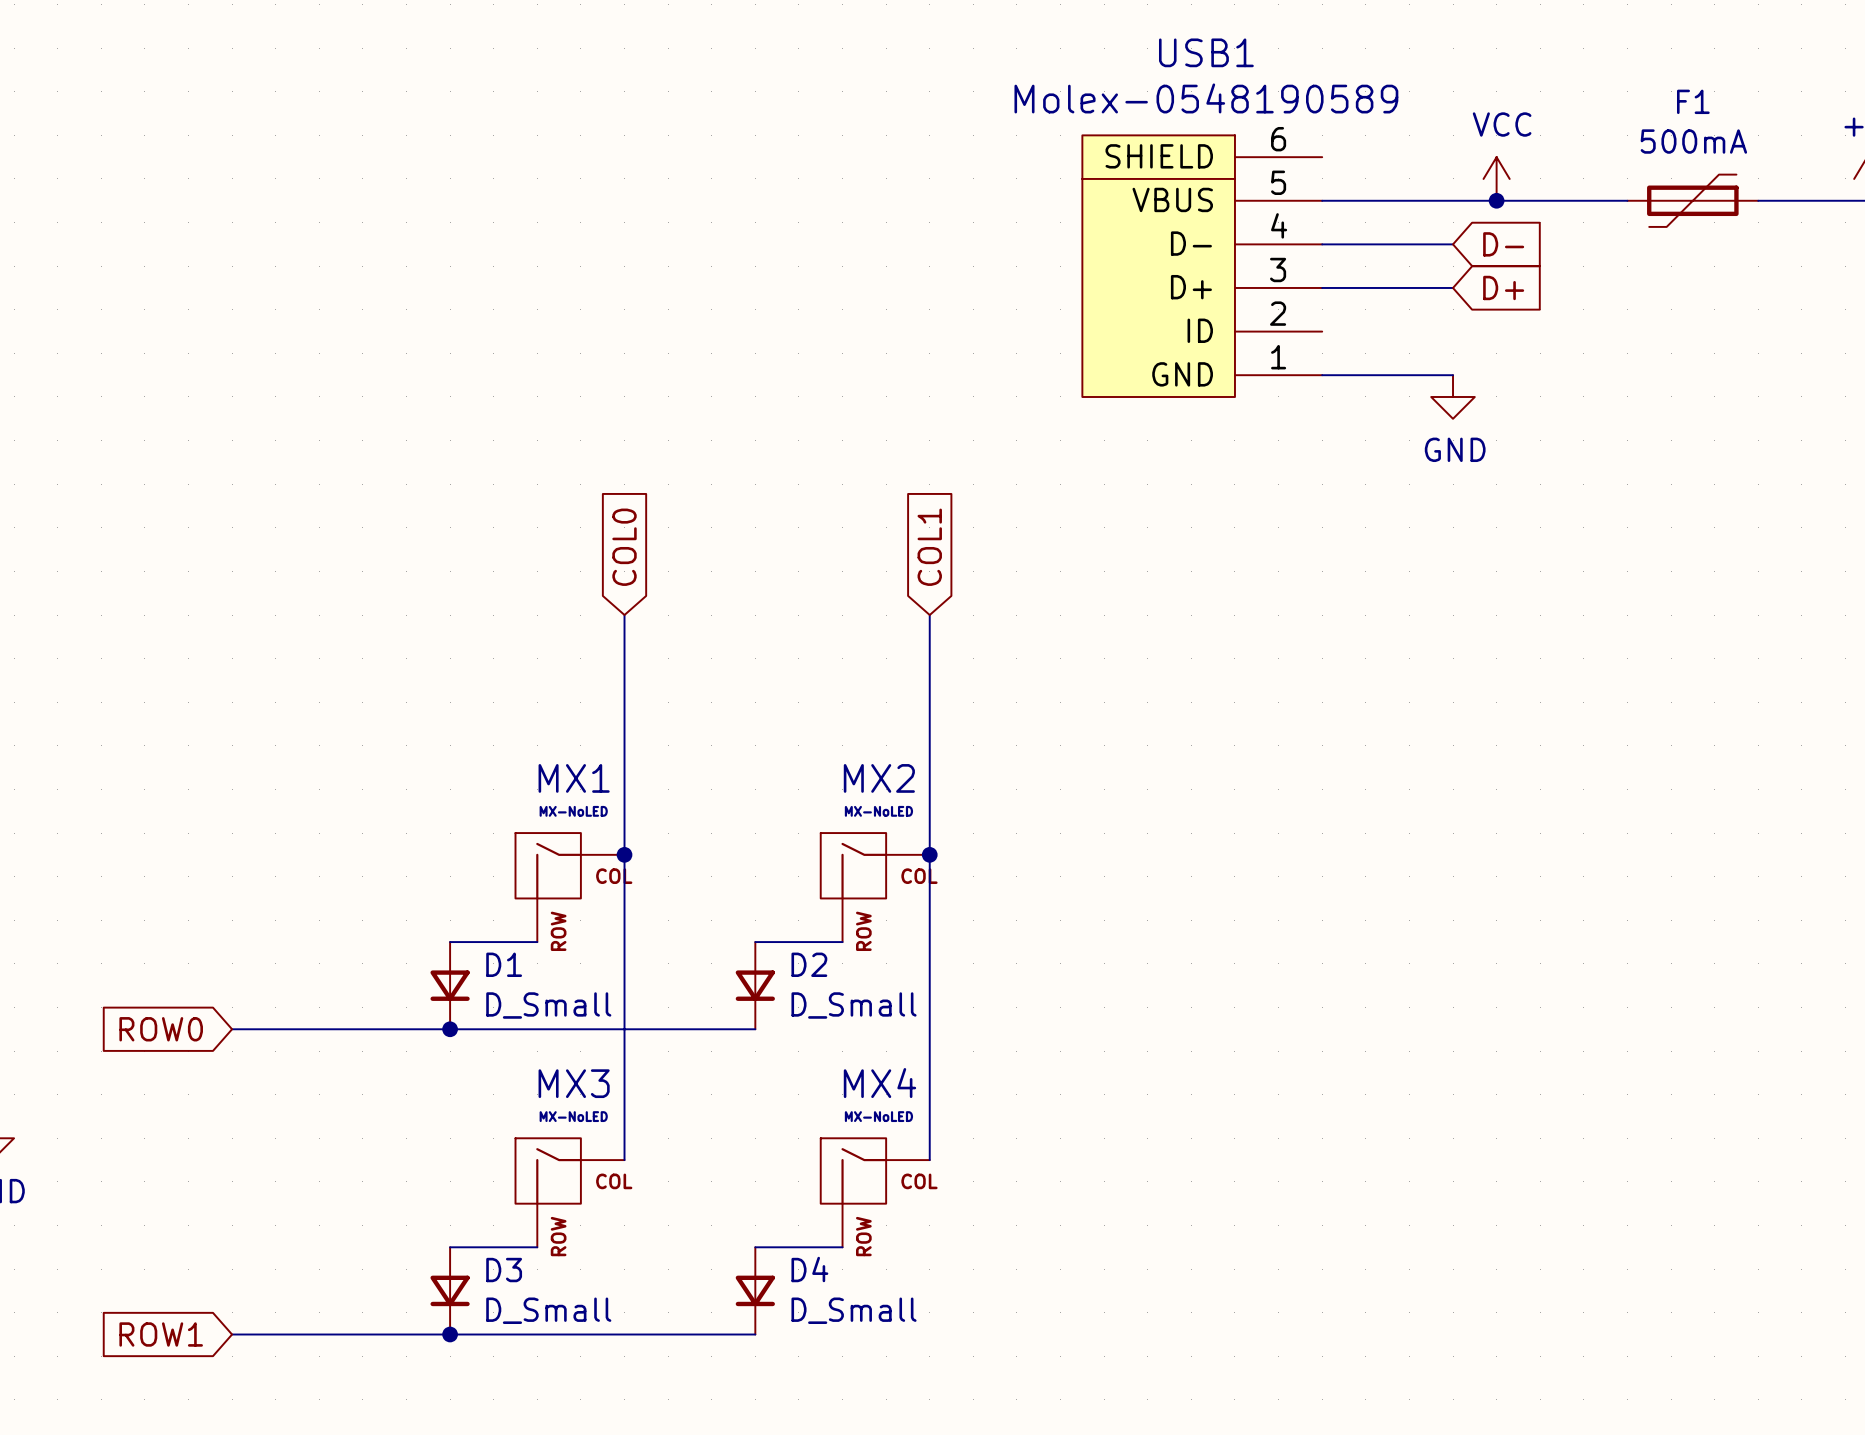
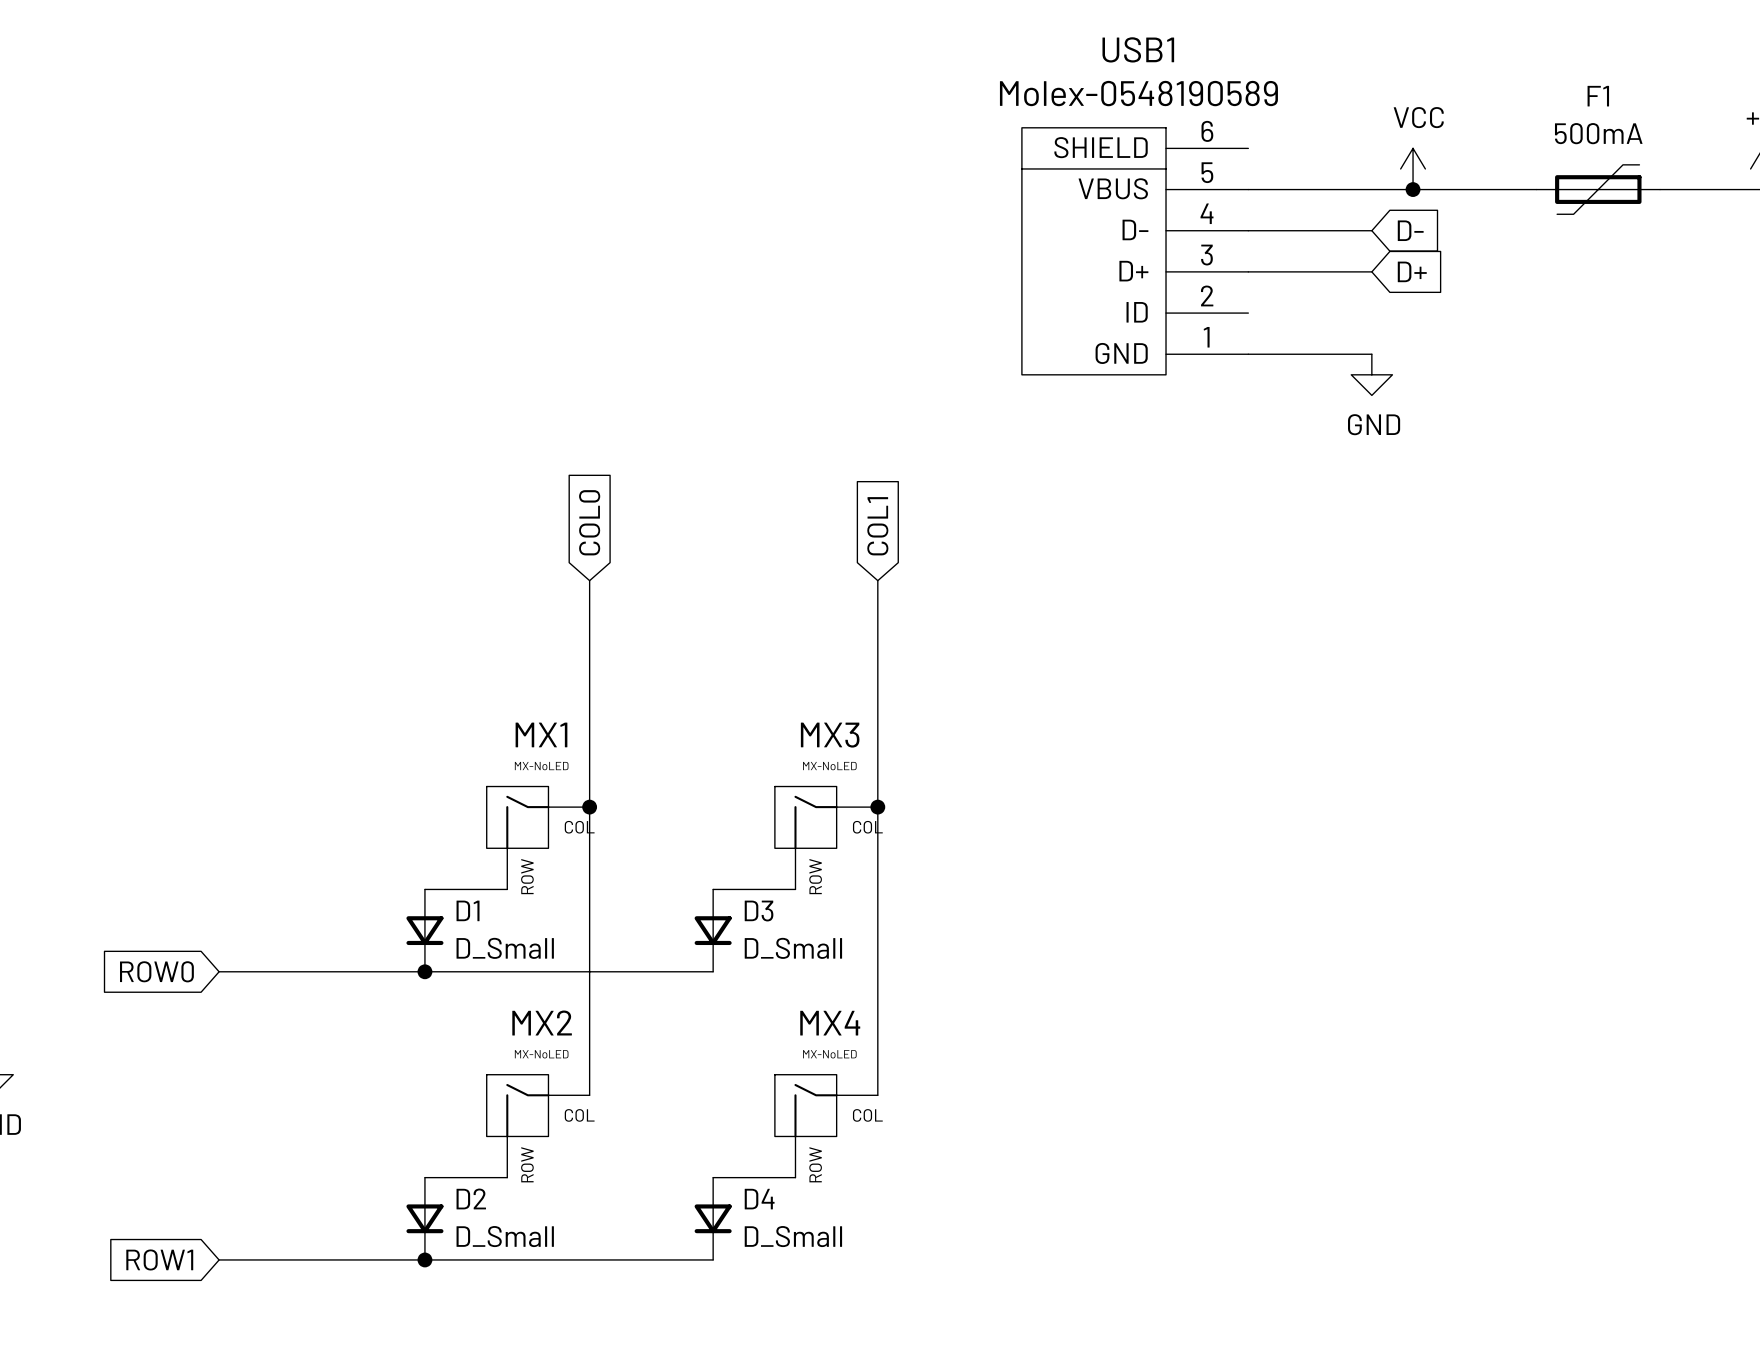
MX2 name: MX2 (879, 778) -> MX3 (830, 735)
D2 name: D2 (809, 964) -> D3 (759, 911)
MX3 name: MX3 (574, 1083) -> MX2 (542, 1023)
D3 name: D3 (504, 1270) -> D2 (471, 1198)

